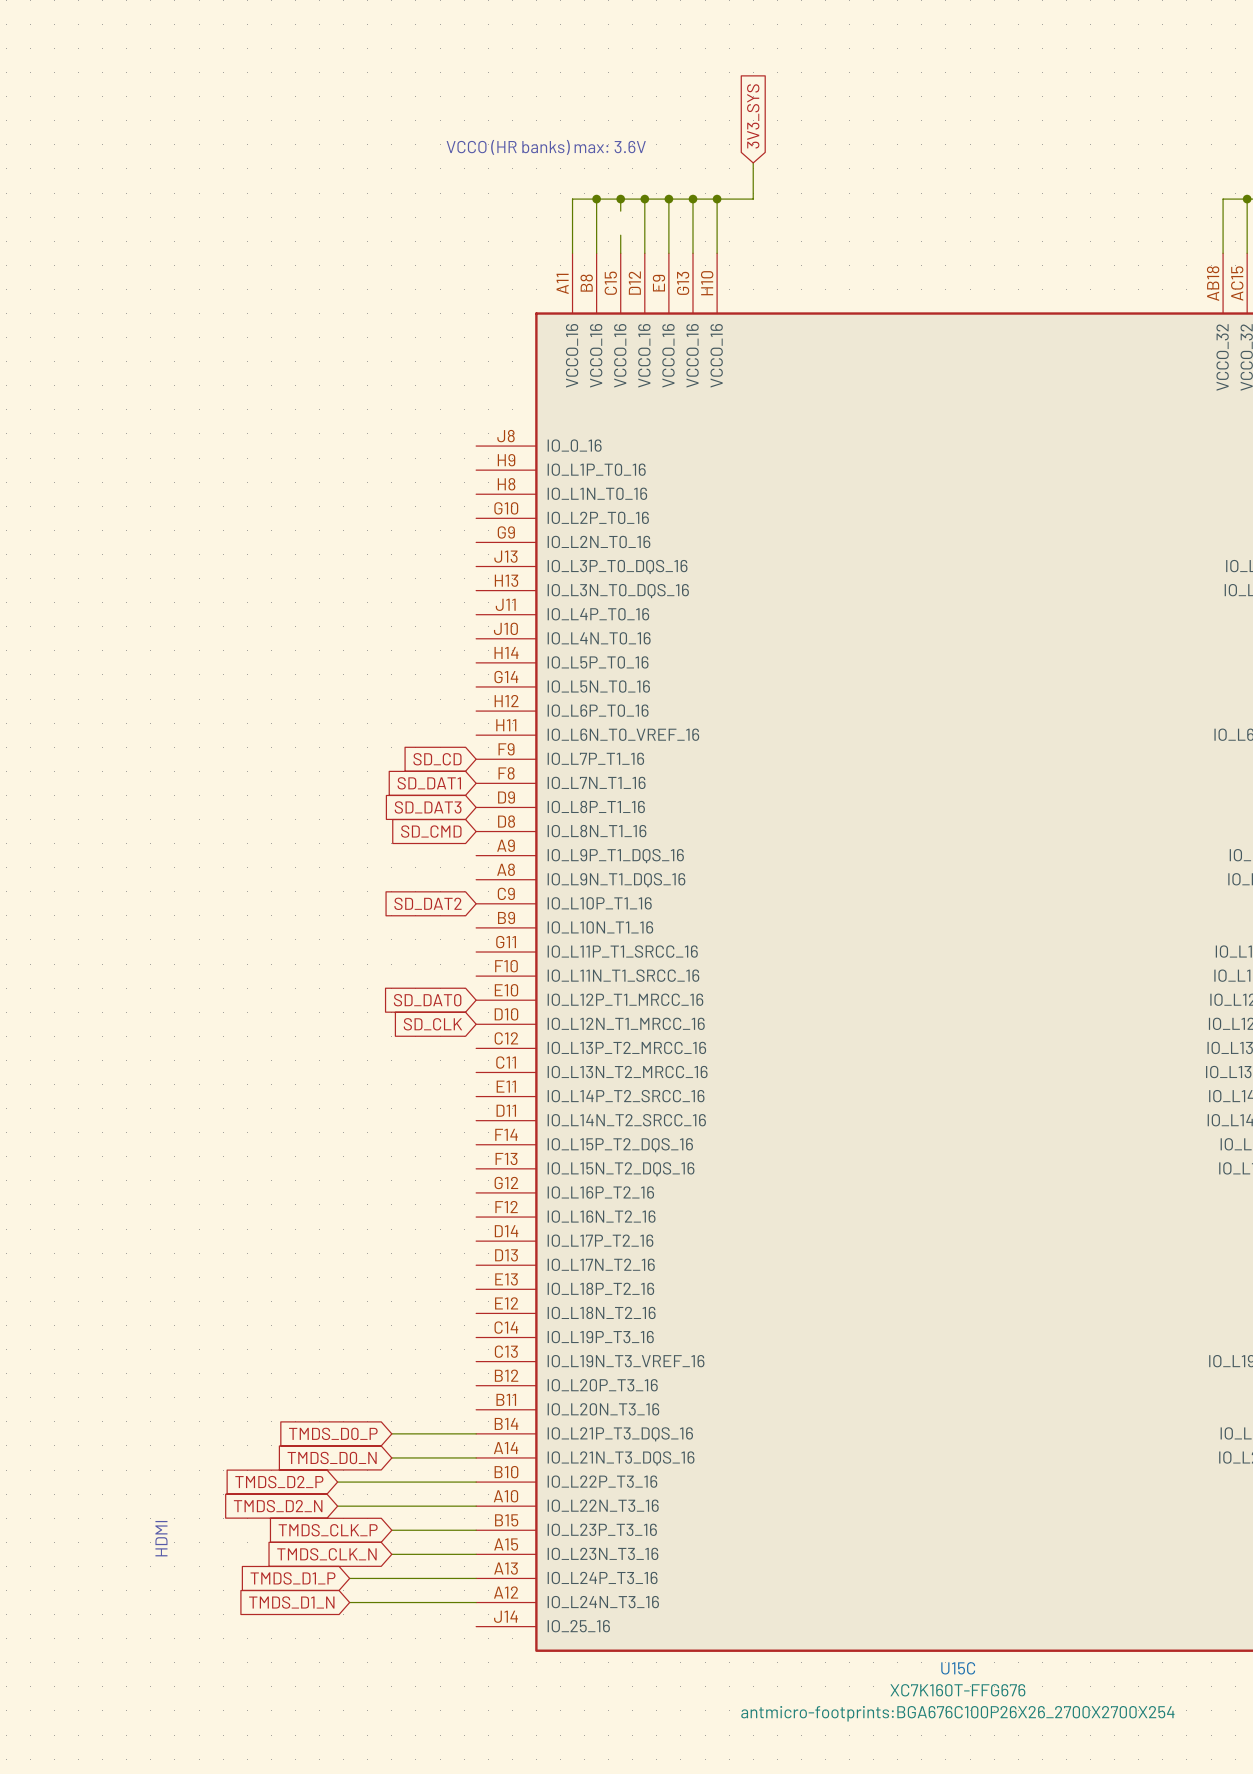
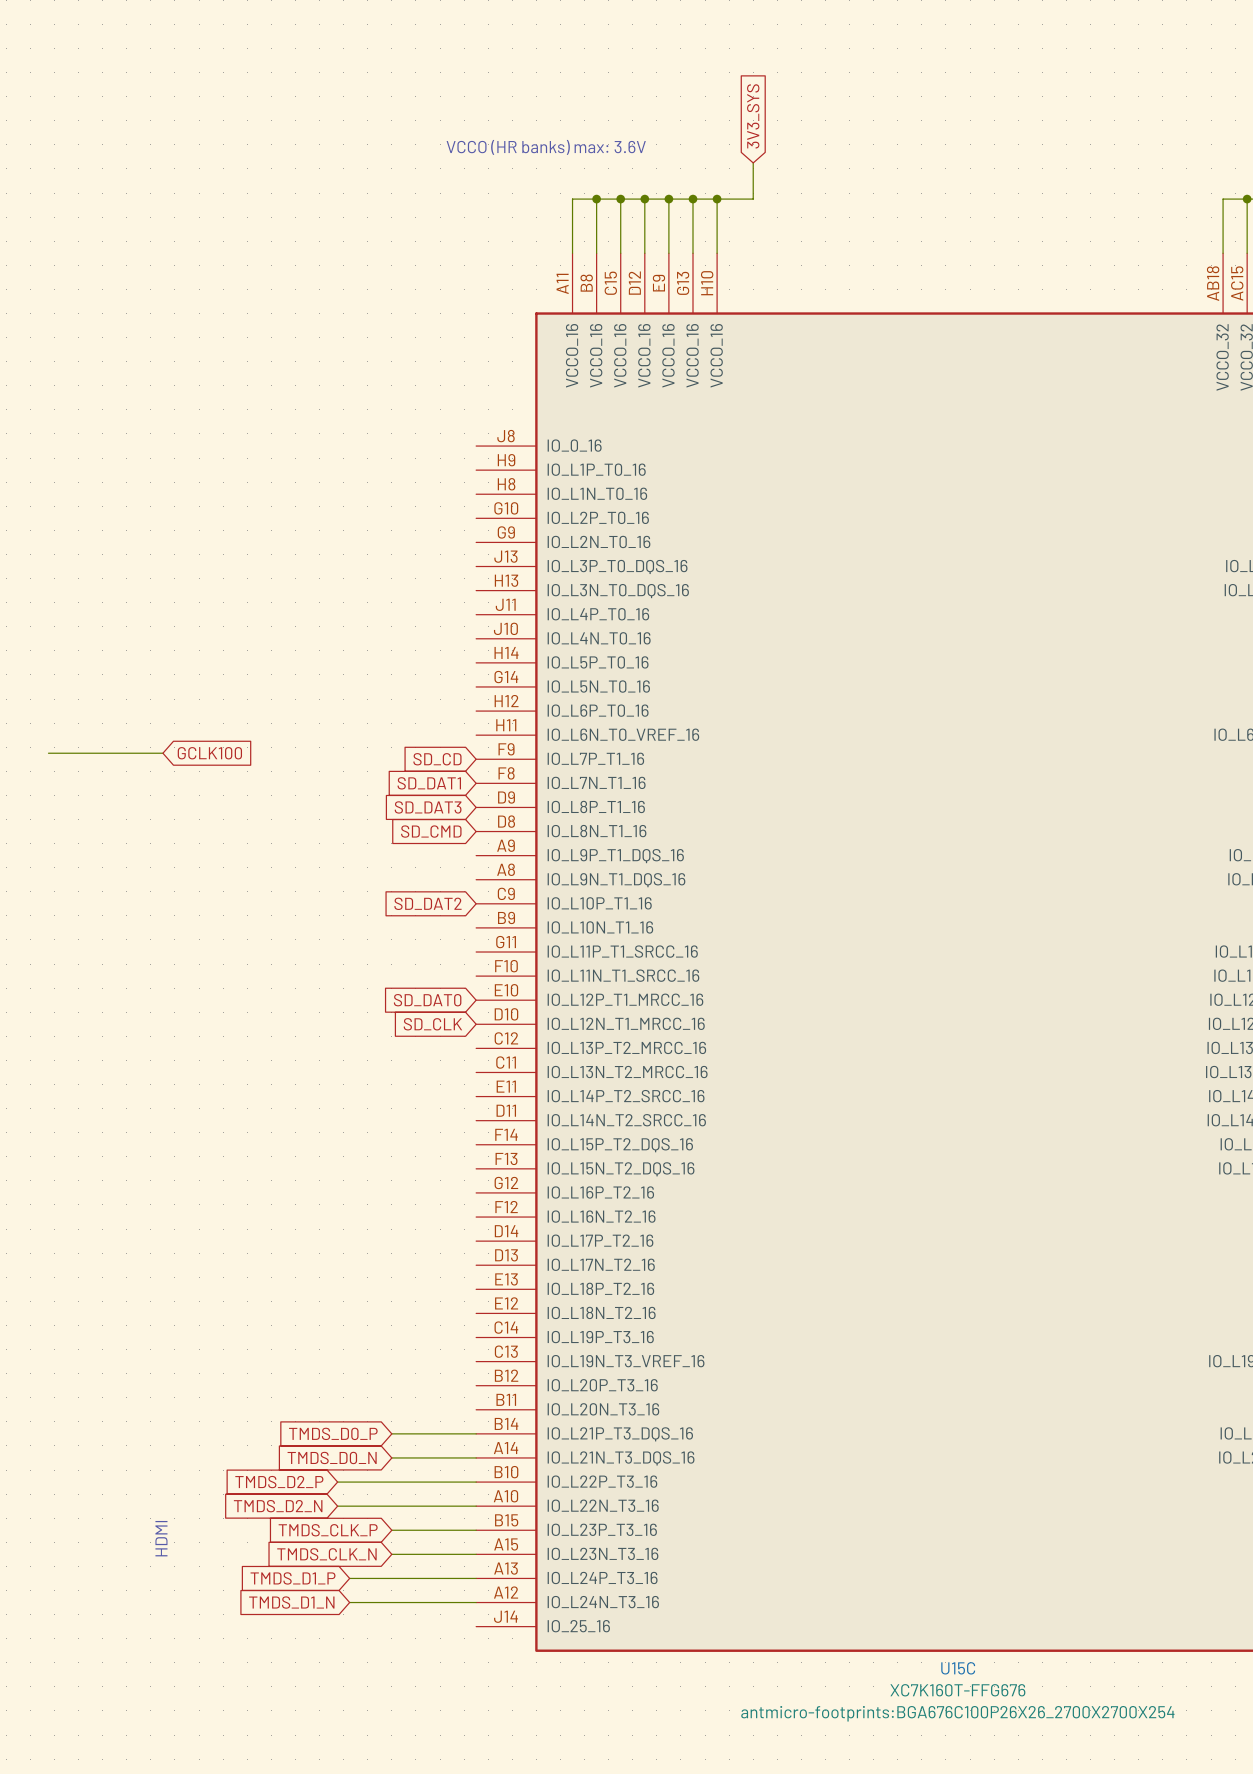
wire: none -> (620, 211) (620, 235)
wire: none -> (48, 753) (162, 753)
global label: none -> GCLK100 (209, 753)

